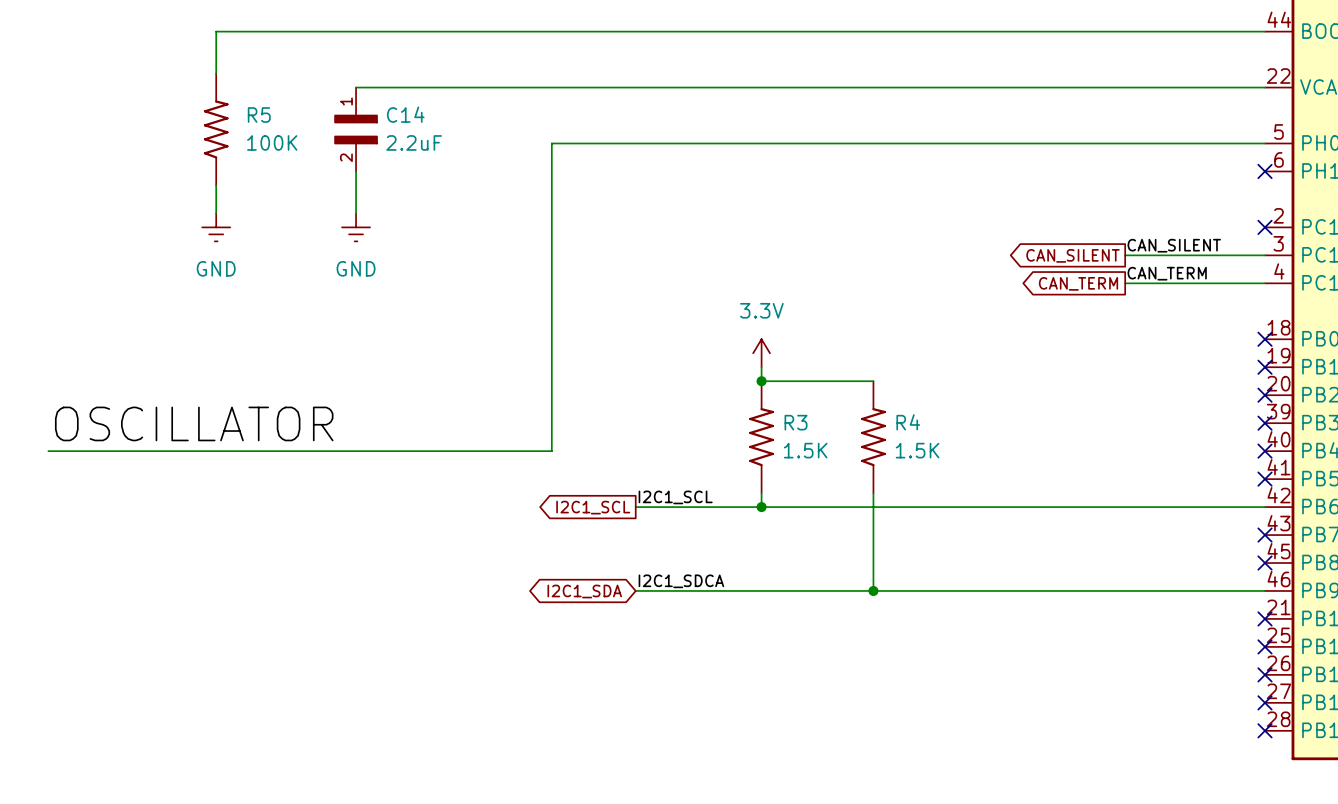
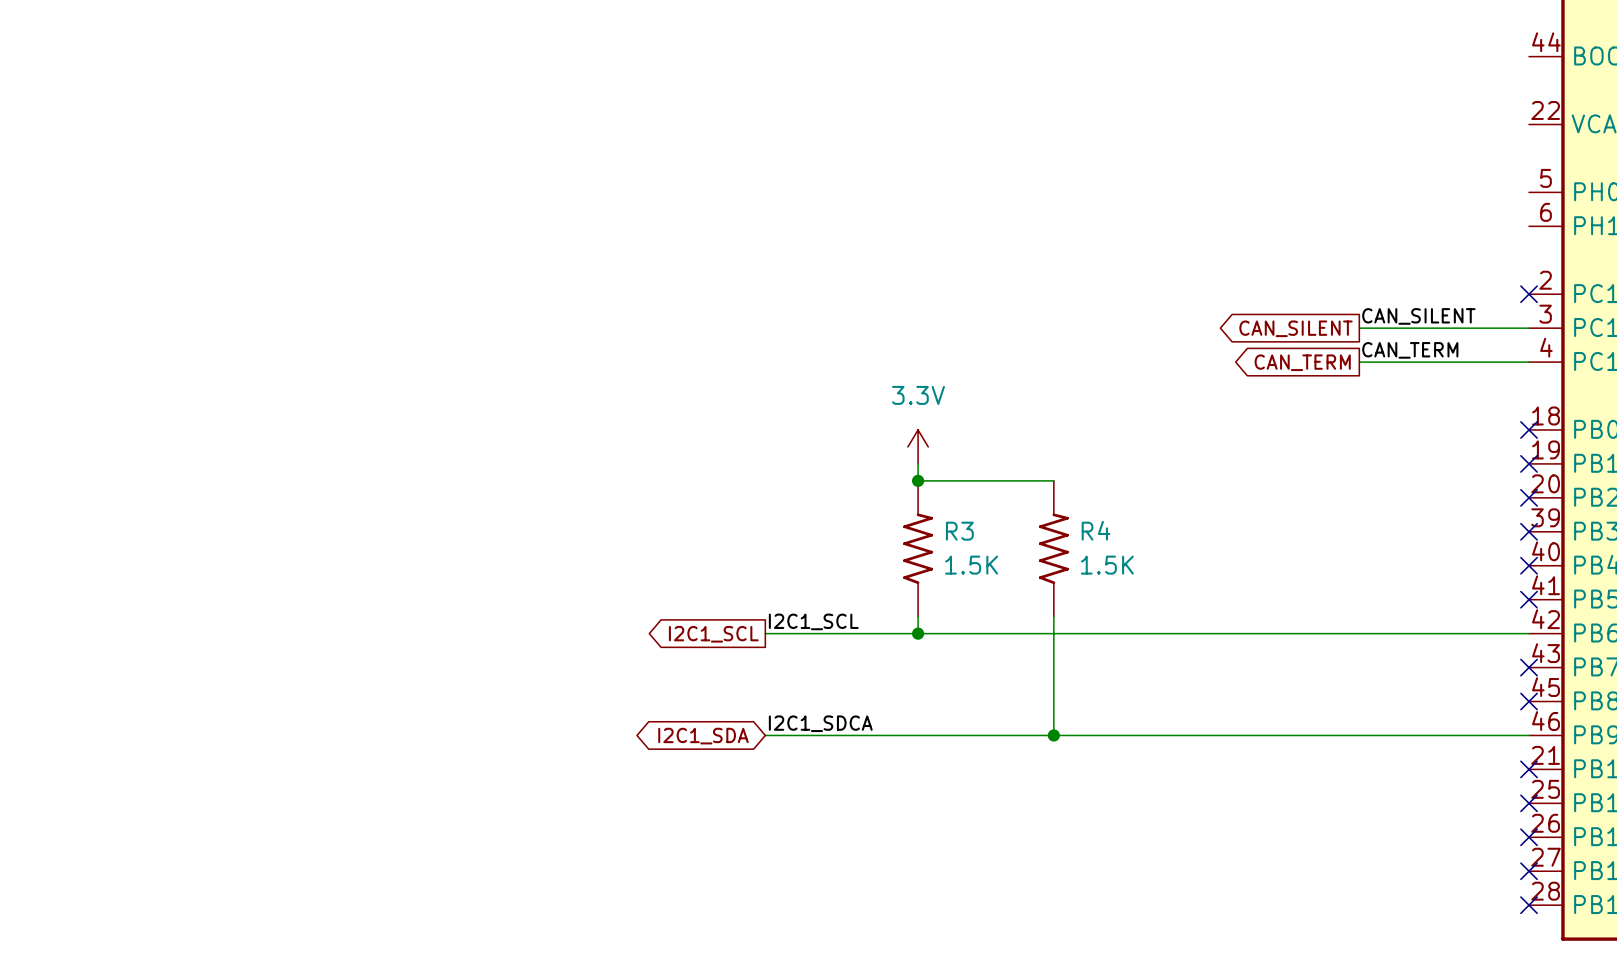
wire: (1265, 31) (216, 31) (216, 73) -> none
wire: (356, 87) (1265, 87) -> none
R5: 100K (216, 129) -> none
C14: 2.2uF (356, 129) -> none
wire: (1265, 143) (551, 143) (551, 451) (48, 451) -> none
wire: (356, 171) (356, 213) -> none
no-connect mark: (1265, 171) -> none
wire: (216, 185) (216, 213) -> none
power symbol: GND (216, 227) -> none
power symbol: GND (356, 227) -> none
label: OSCILLATOR (194, 423) -> none

